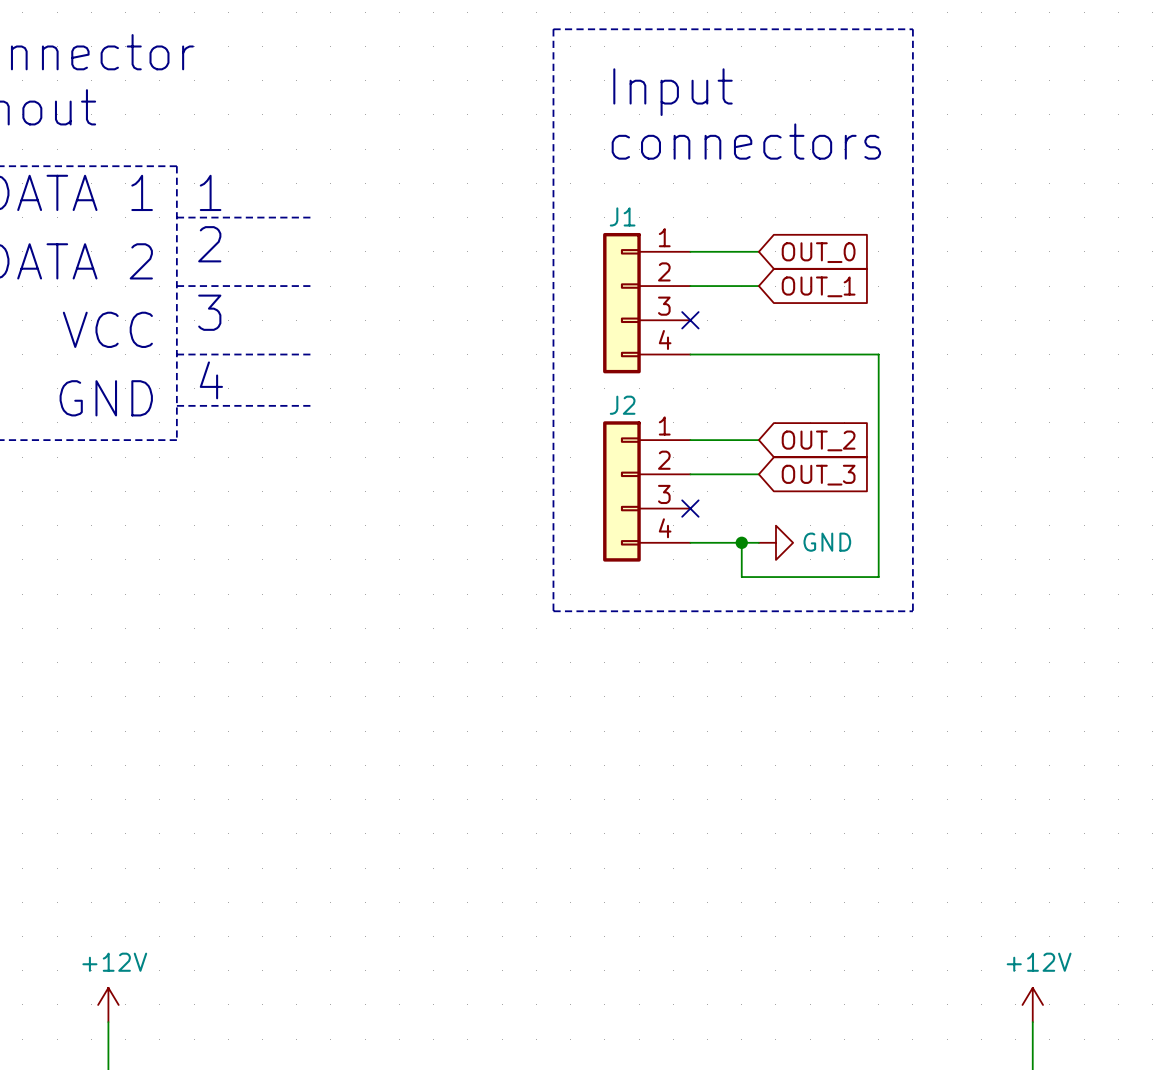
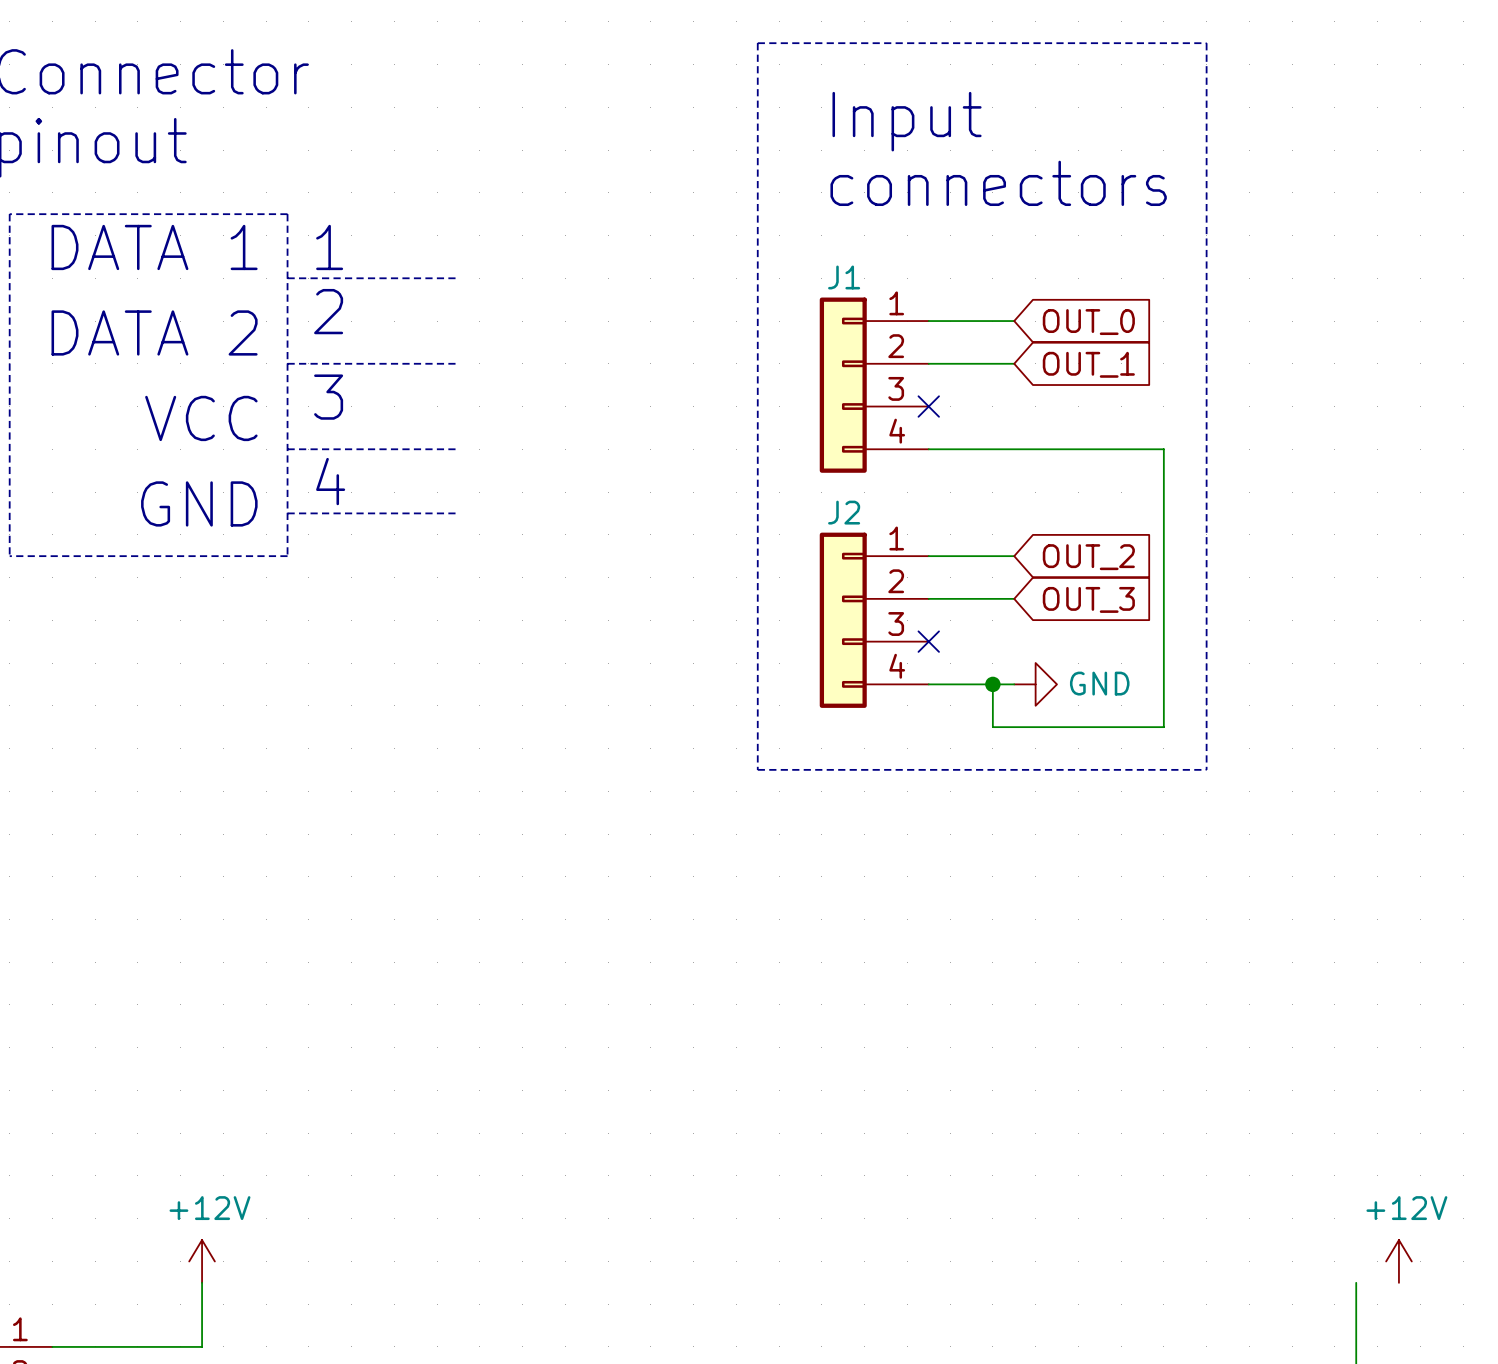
power symbol position: +12V (1032, 1004) -> +12V (1398, 1261)

